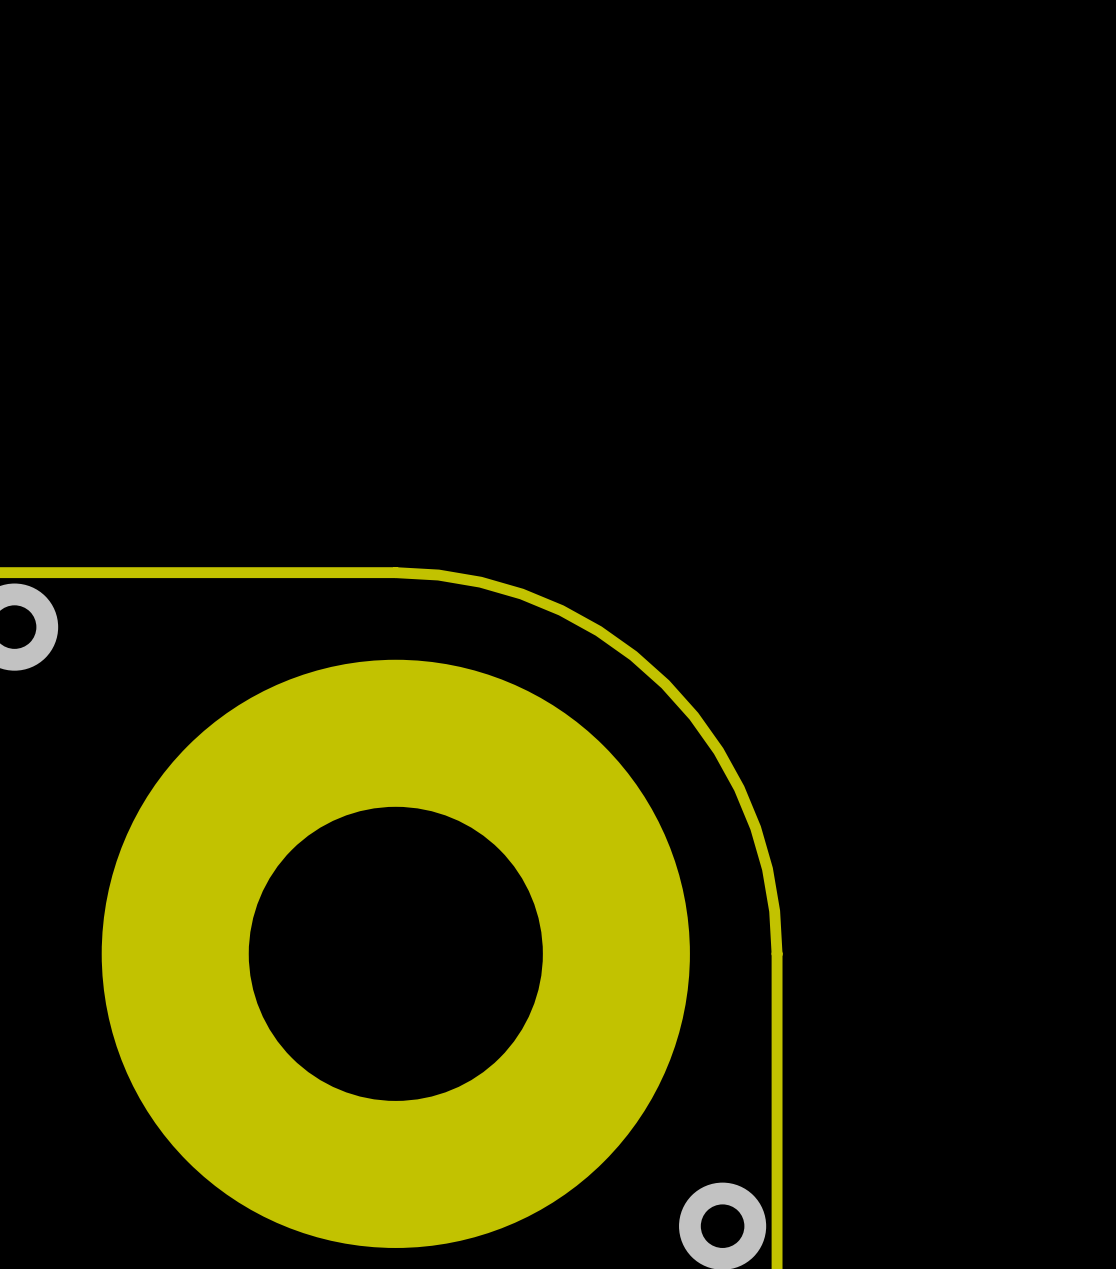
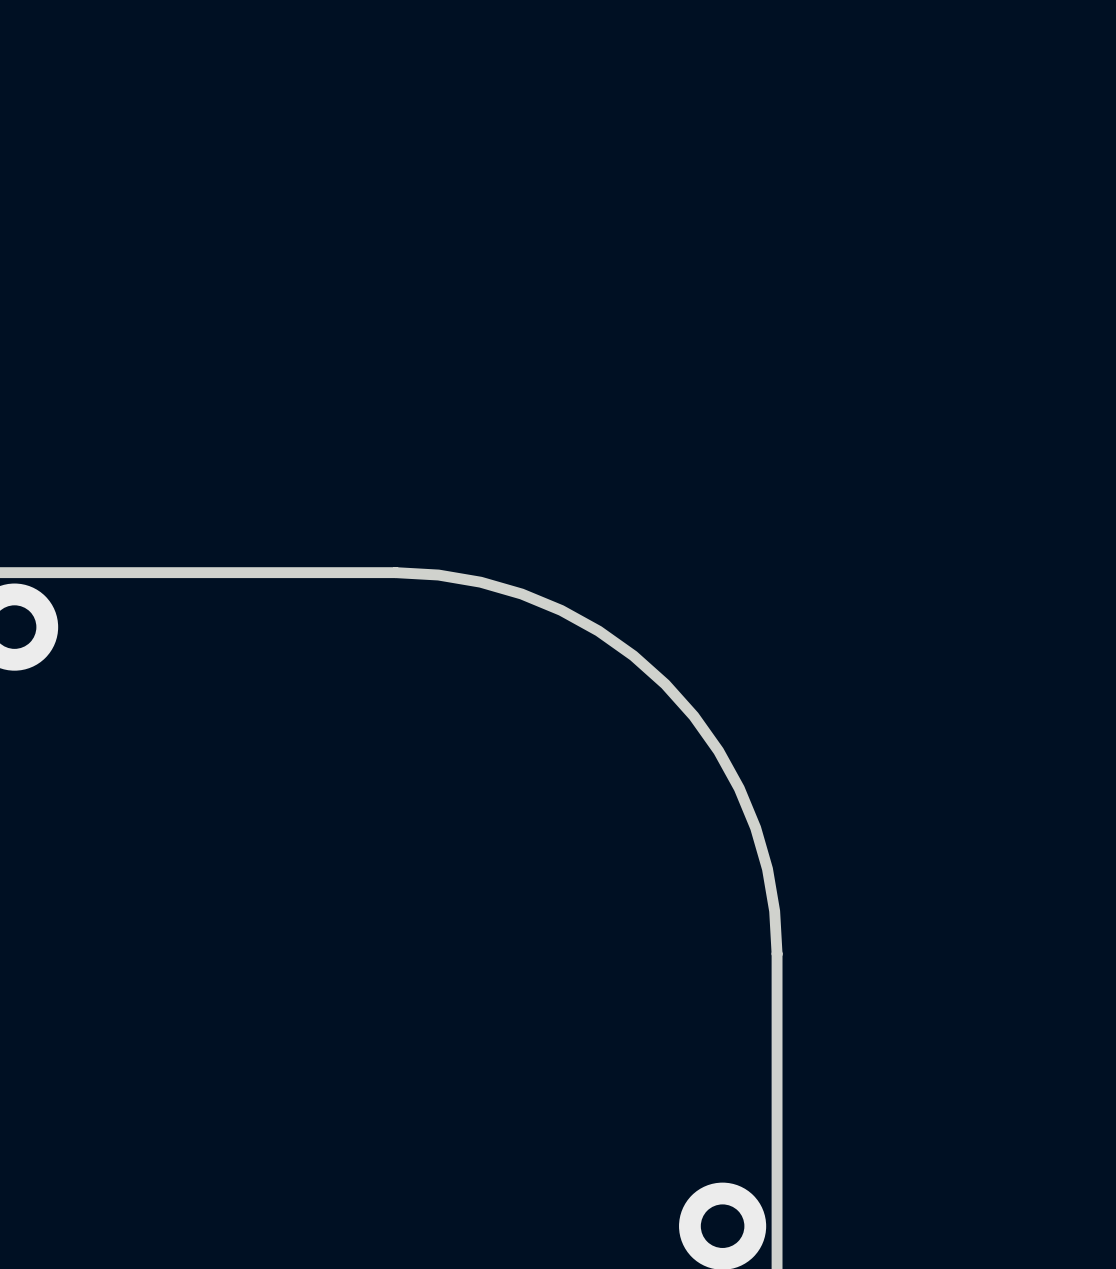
part: (395, 953) -> none

